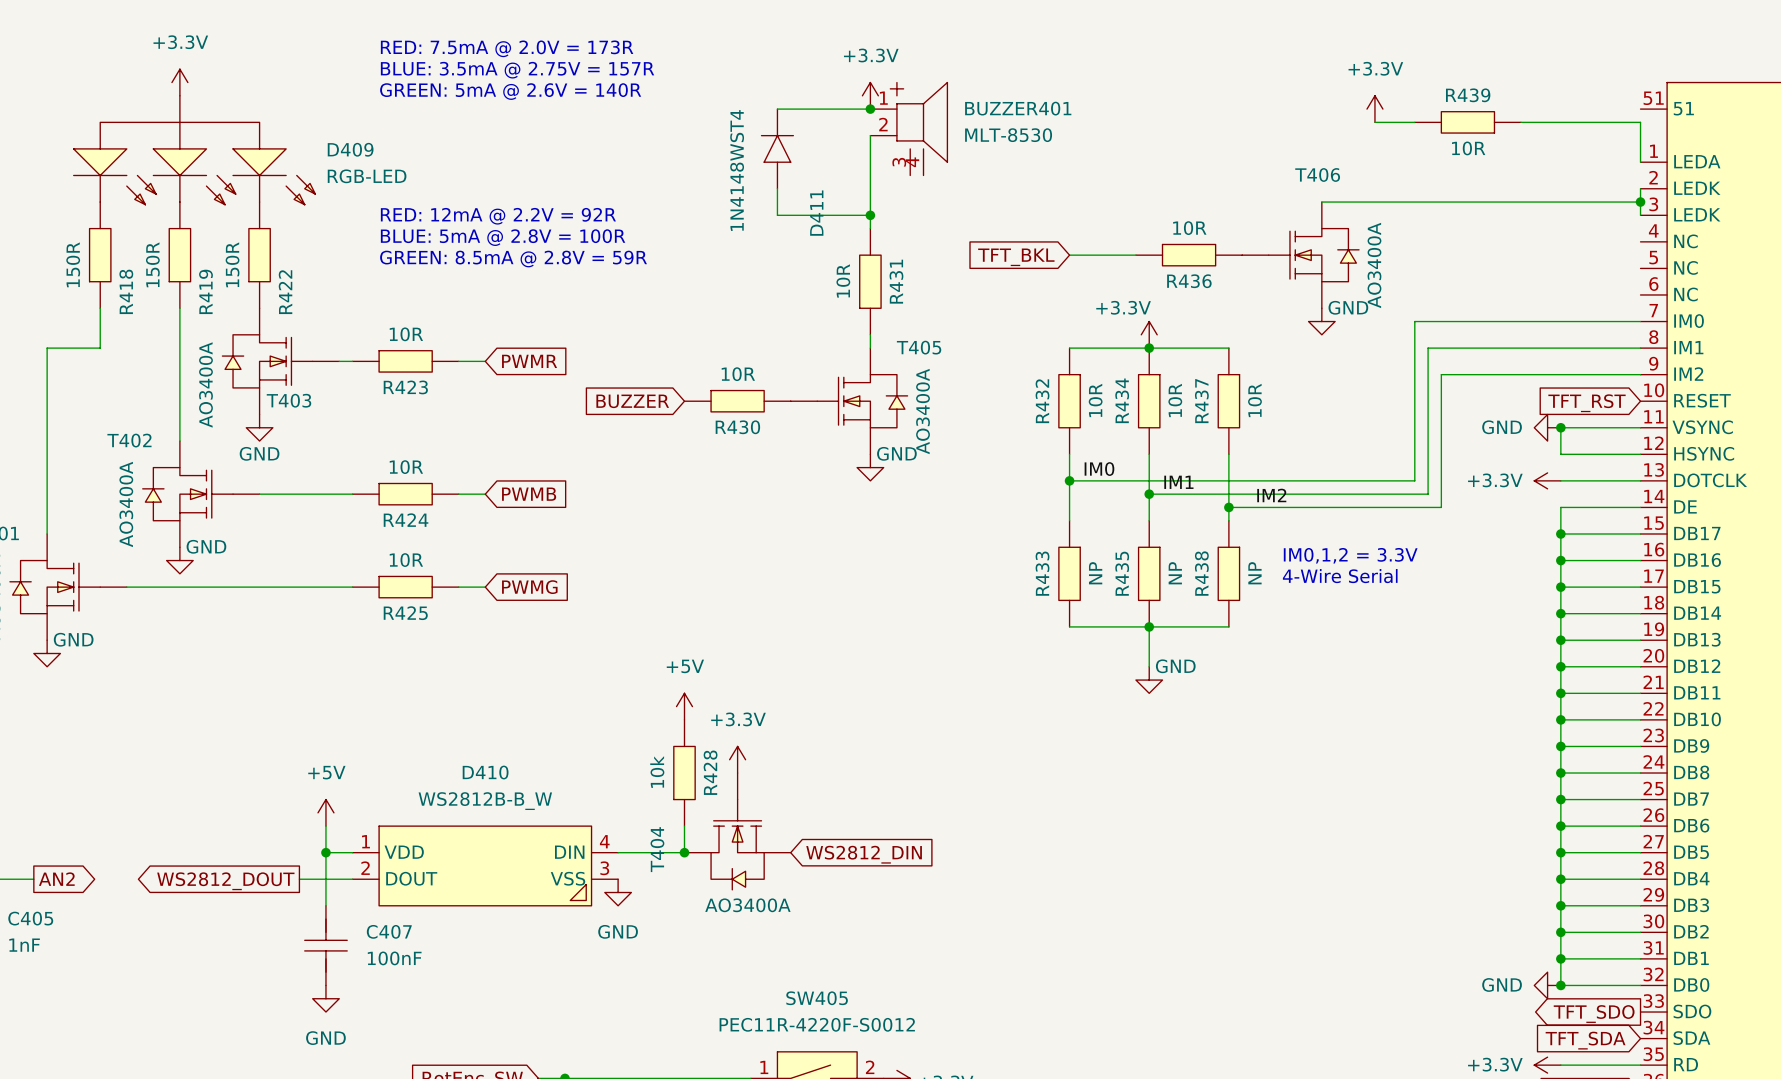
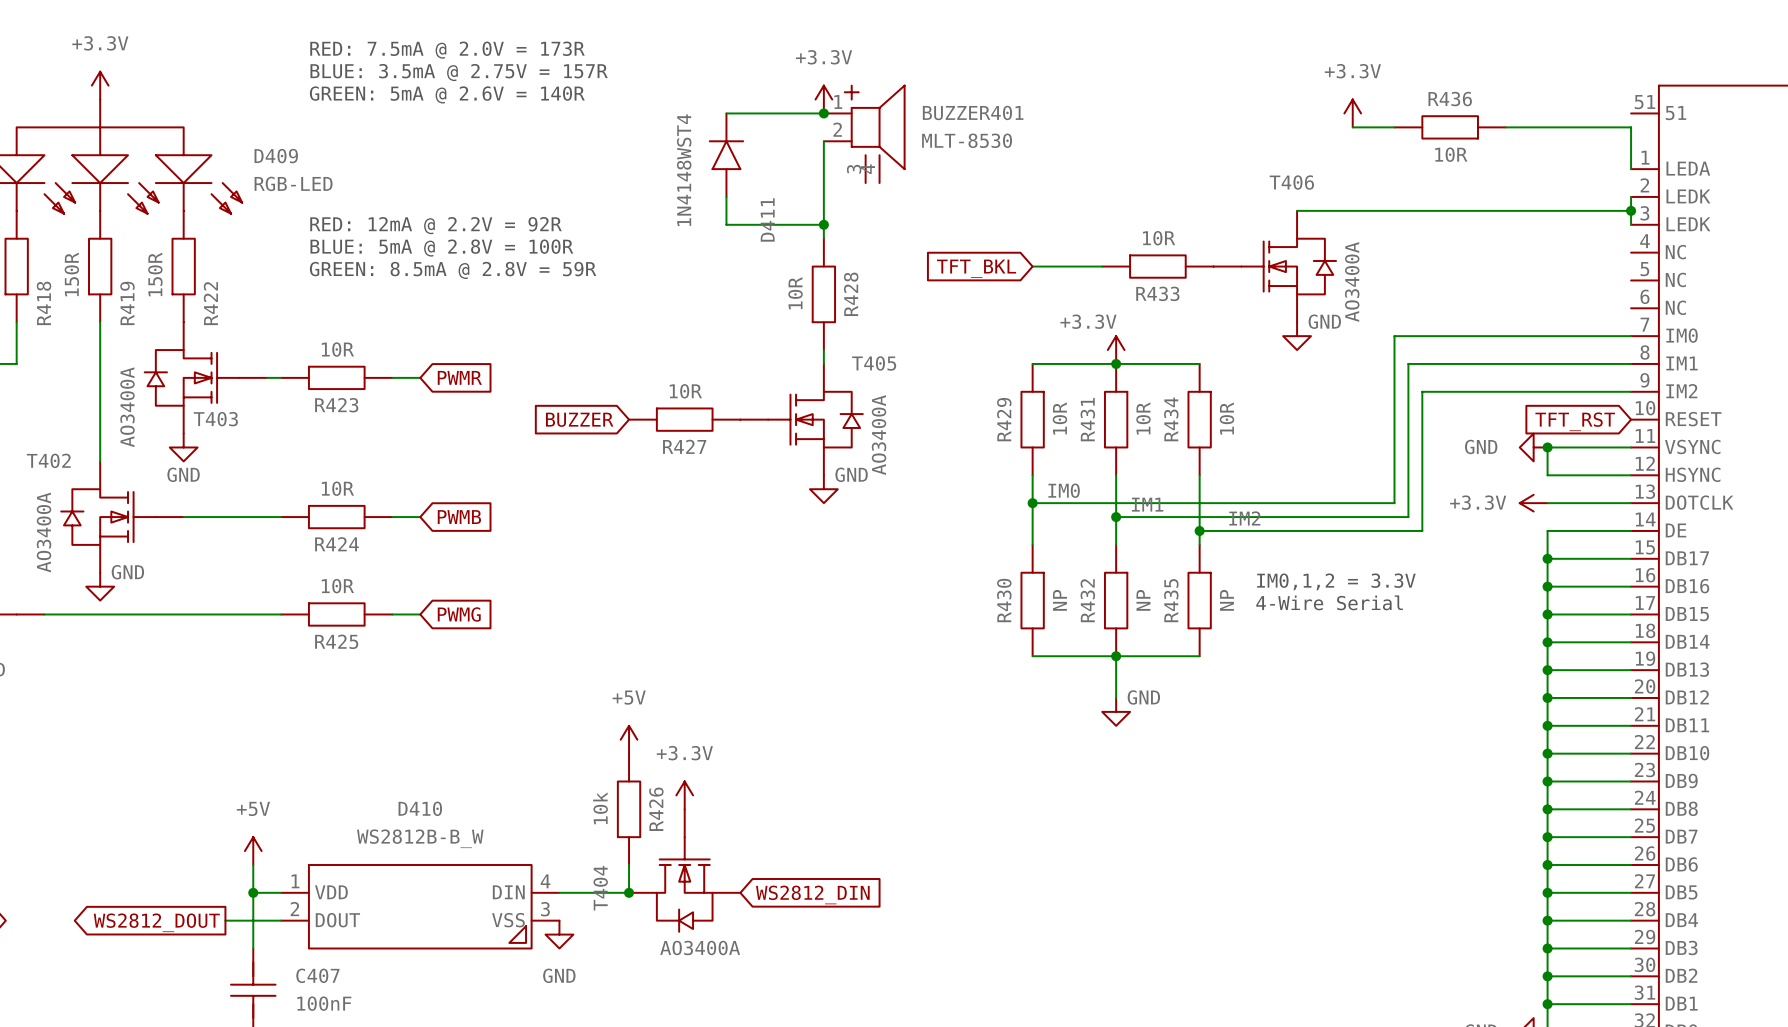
R439 name: R439 (1468, 95) -> R436 (1450, 99)
R431 name: R431 (896, 281) -> R428 (851, 294)
R436 name: R436 (1189, 281) -> R433 (1157, 293)
R434 name: R434 (1122, 400) -> R431 (1087, 419)
R432 name: R432 (1042, 401) -> R429 (1004, 419)
R437 name: R437 (1201, 401) -> R434 (1171, 419)
R430 name: R430 (737, 427) -> R427 (684, 446)
R433 name: R433 (1042, 573) -> R430 (1004, 600)
R435 name: R435 (1122, 573) -> R432 (1087, 600)
R438 name: R438 (1201, 573) -> R435 (1171, 600)
R428 name: R428 (710, 772) -> R426 (656, 809)

